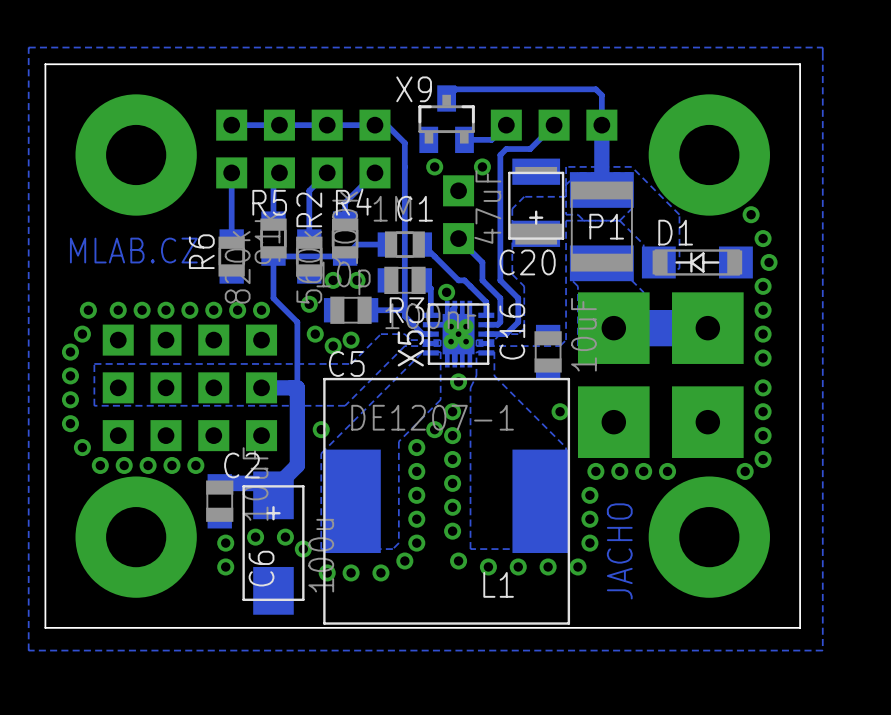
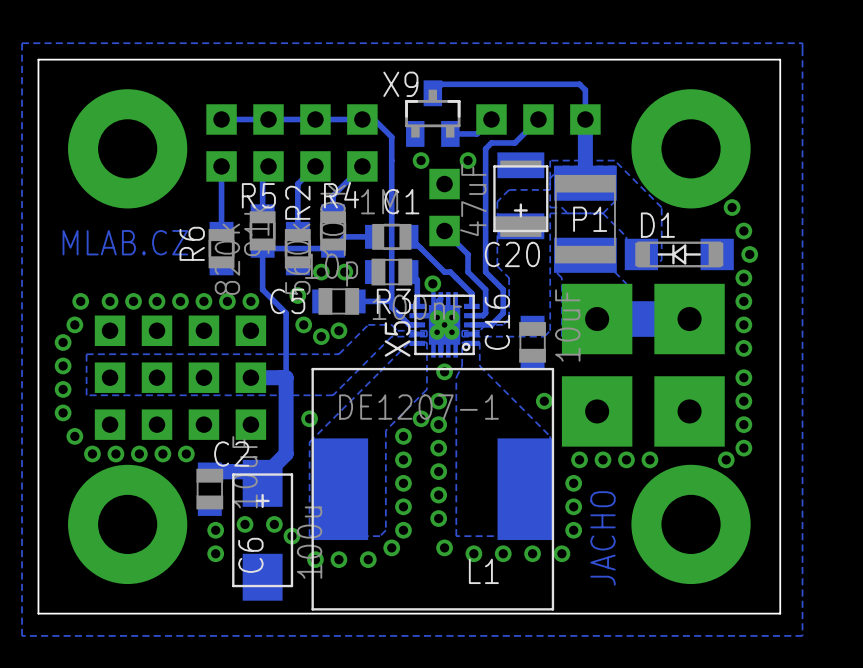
X5 footprint: [422, 300, 495, 368] -> [409, 292, 480, 358]
C5 name position: C5 (346, 363) -> C5 (287, 301)

